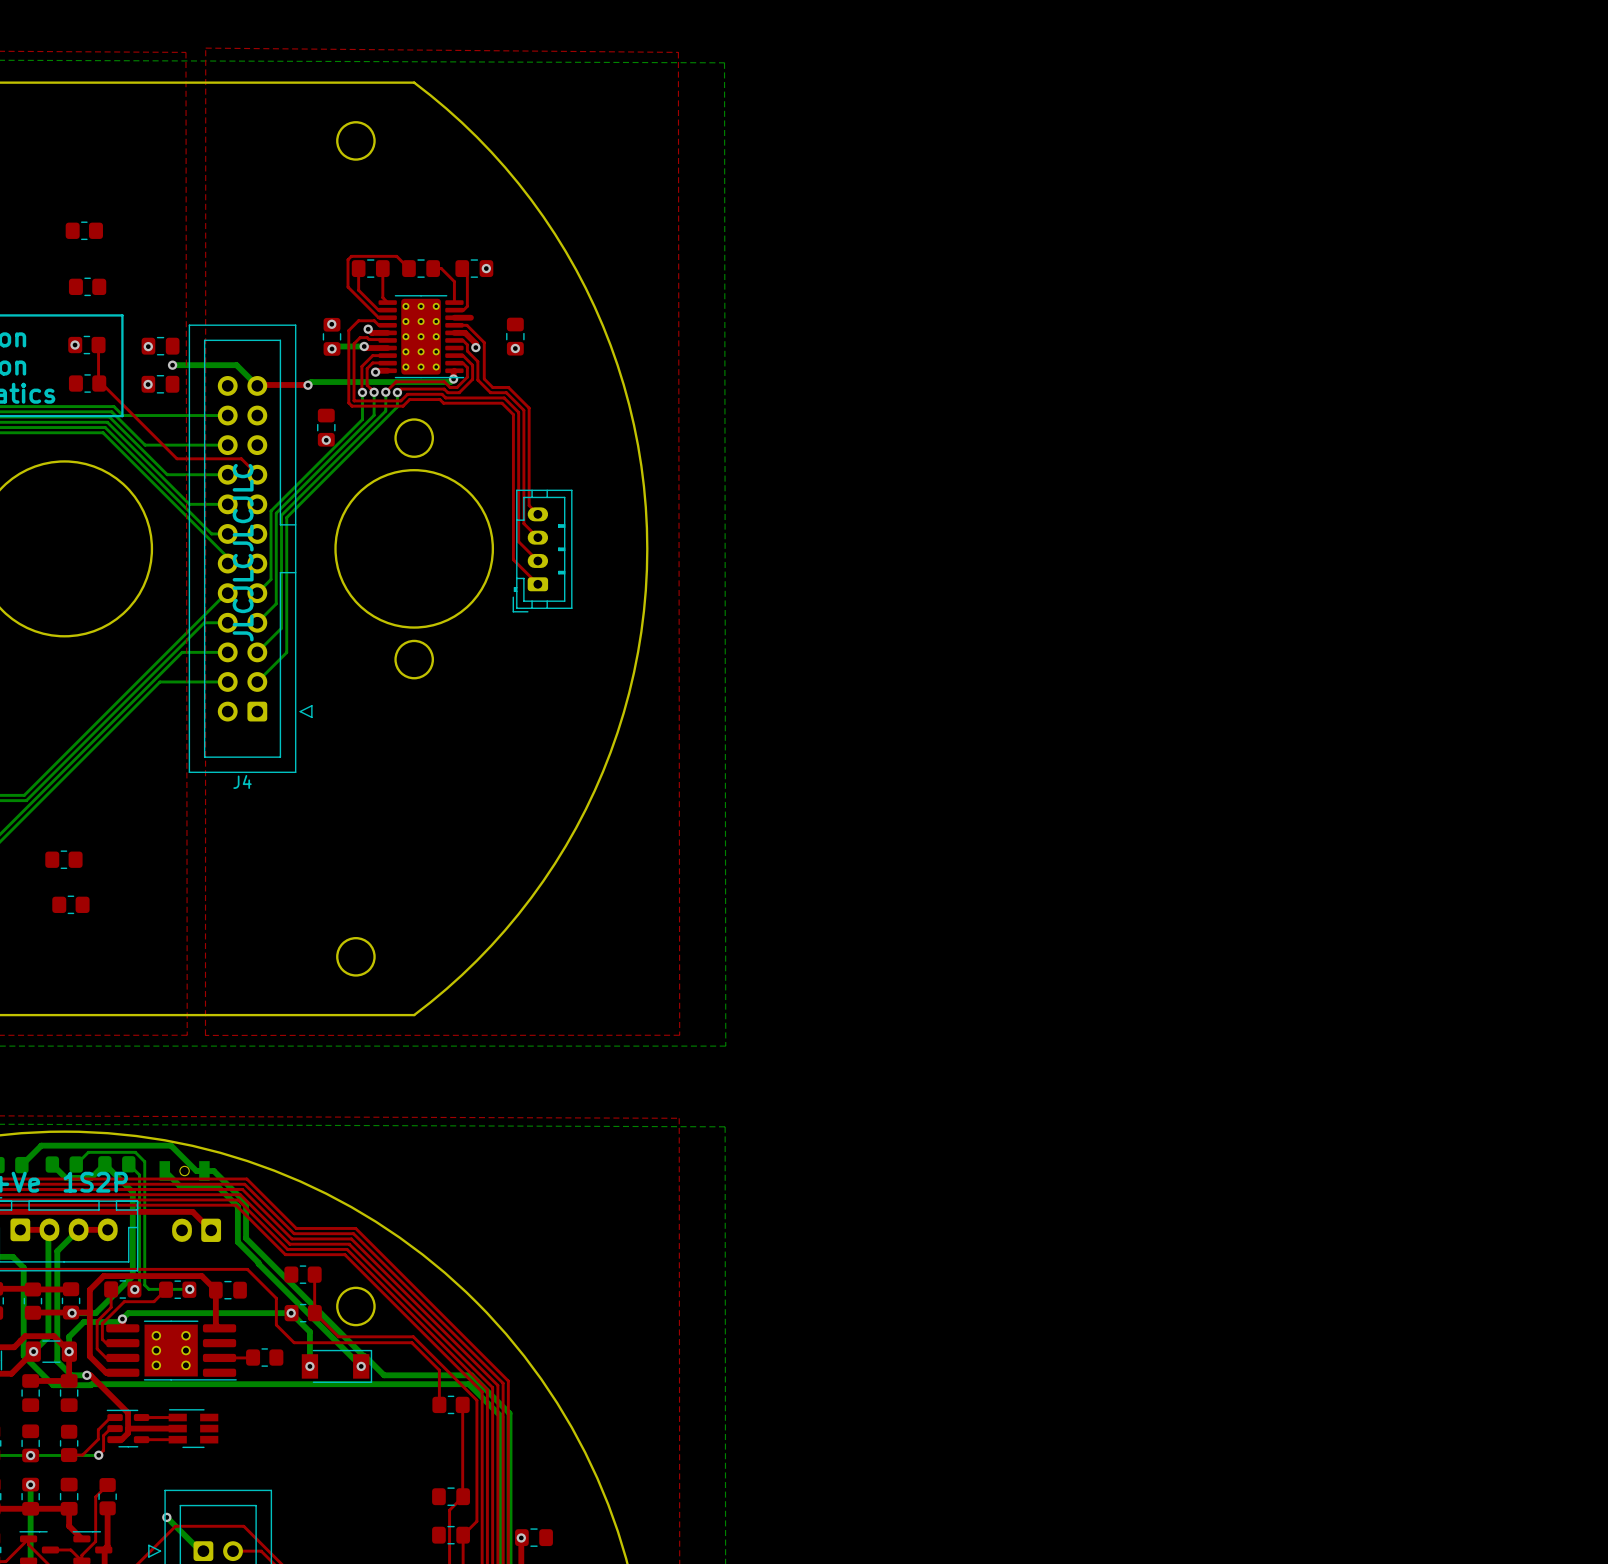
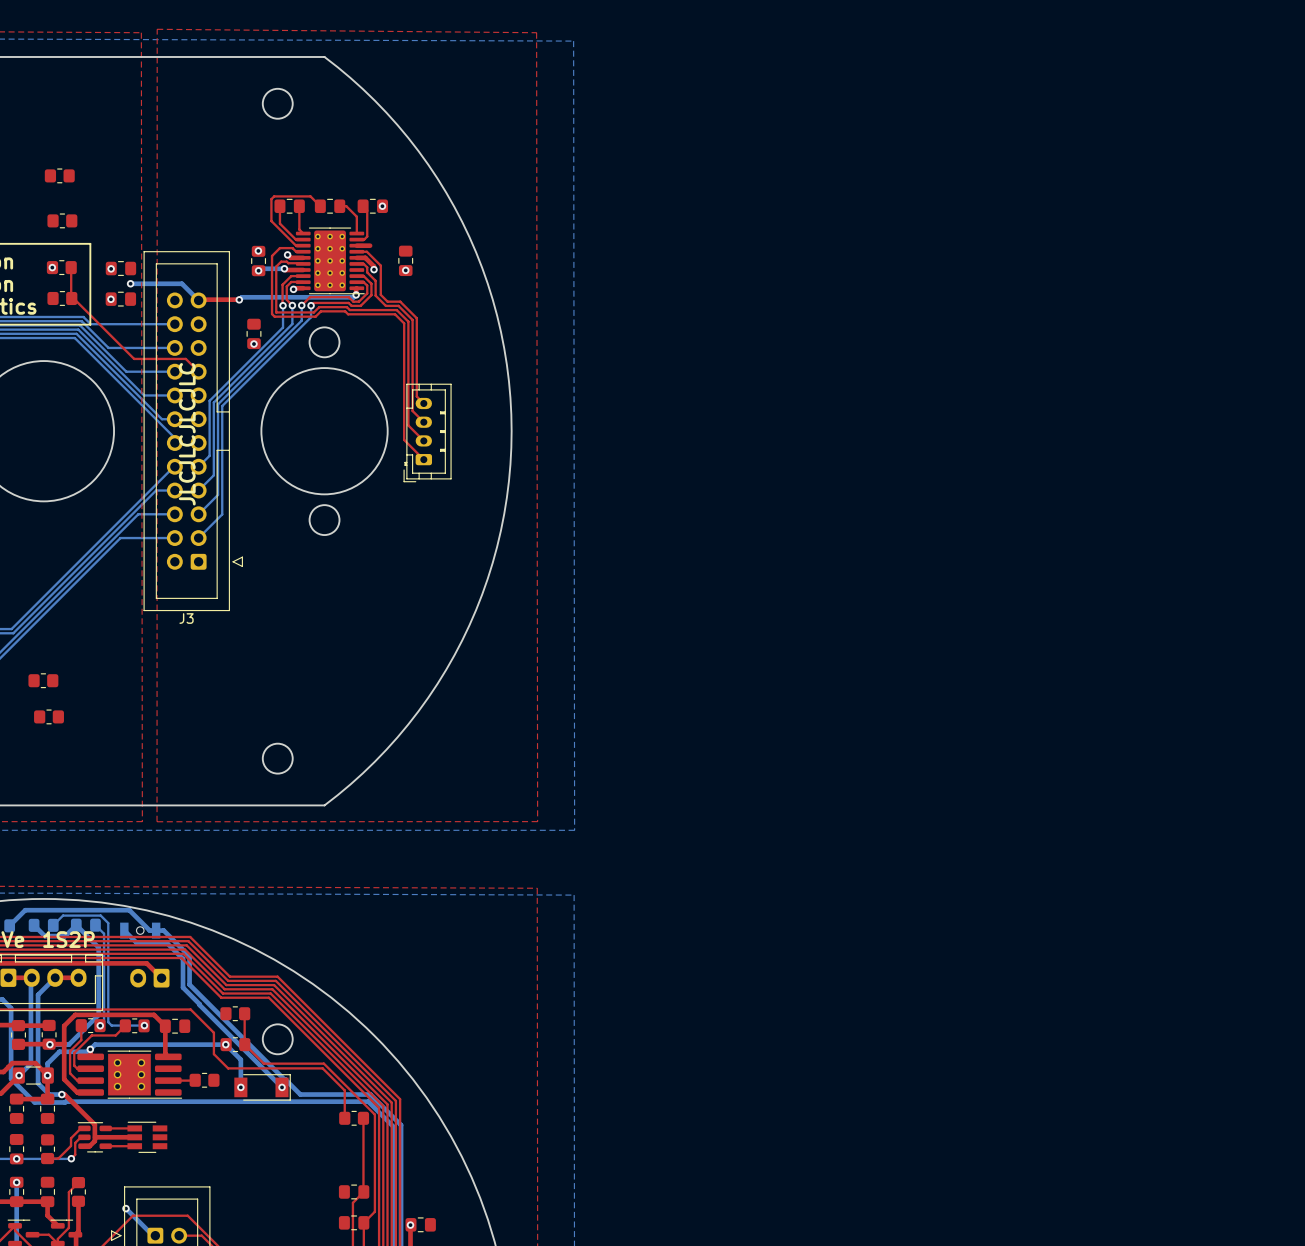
J4 name: J4 (242, 781) -> J3 (186, 618)

